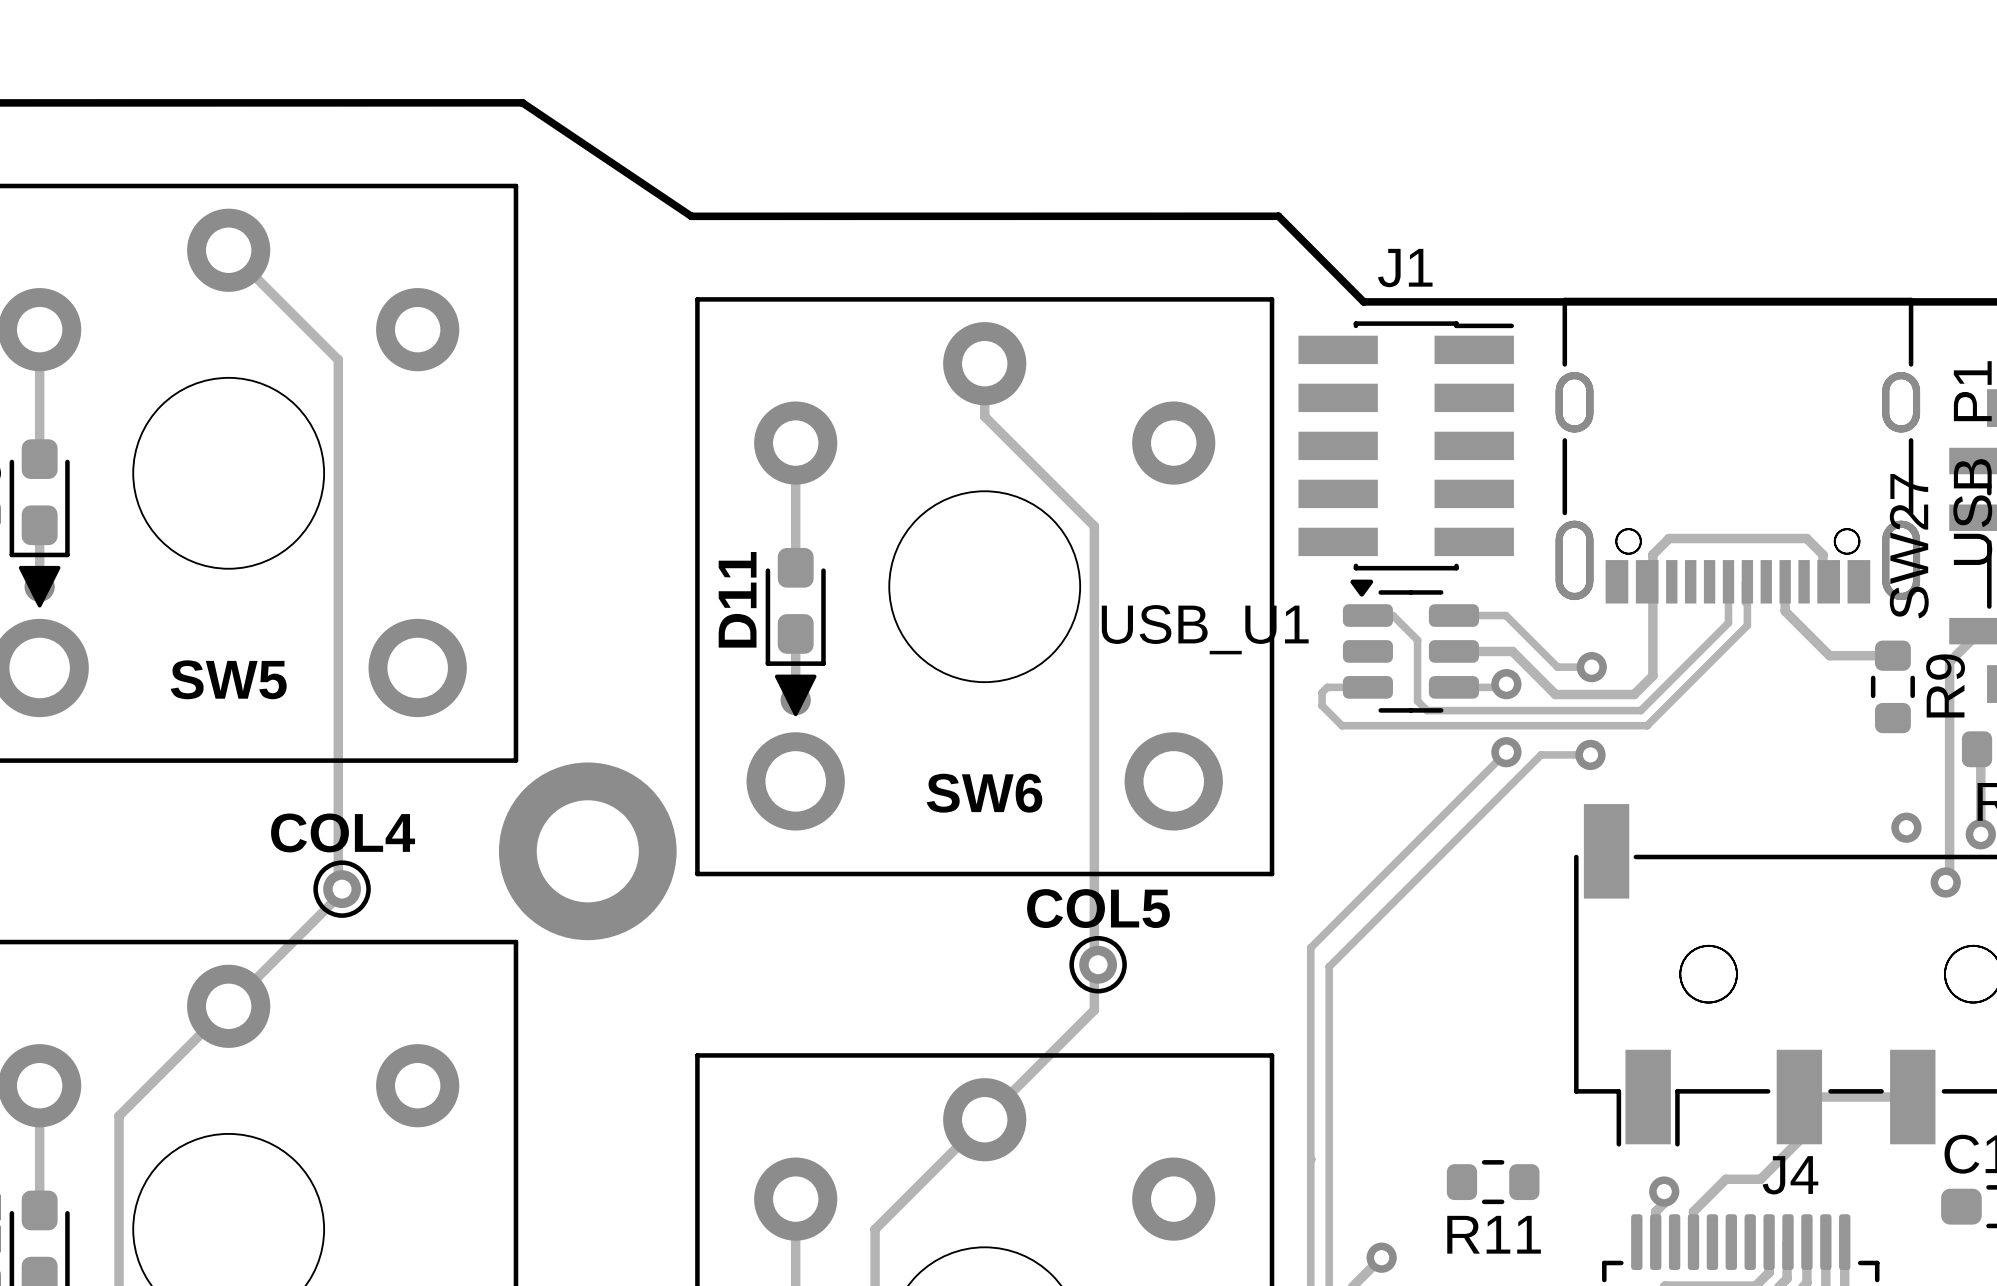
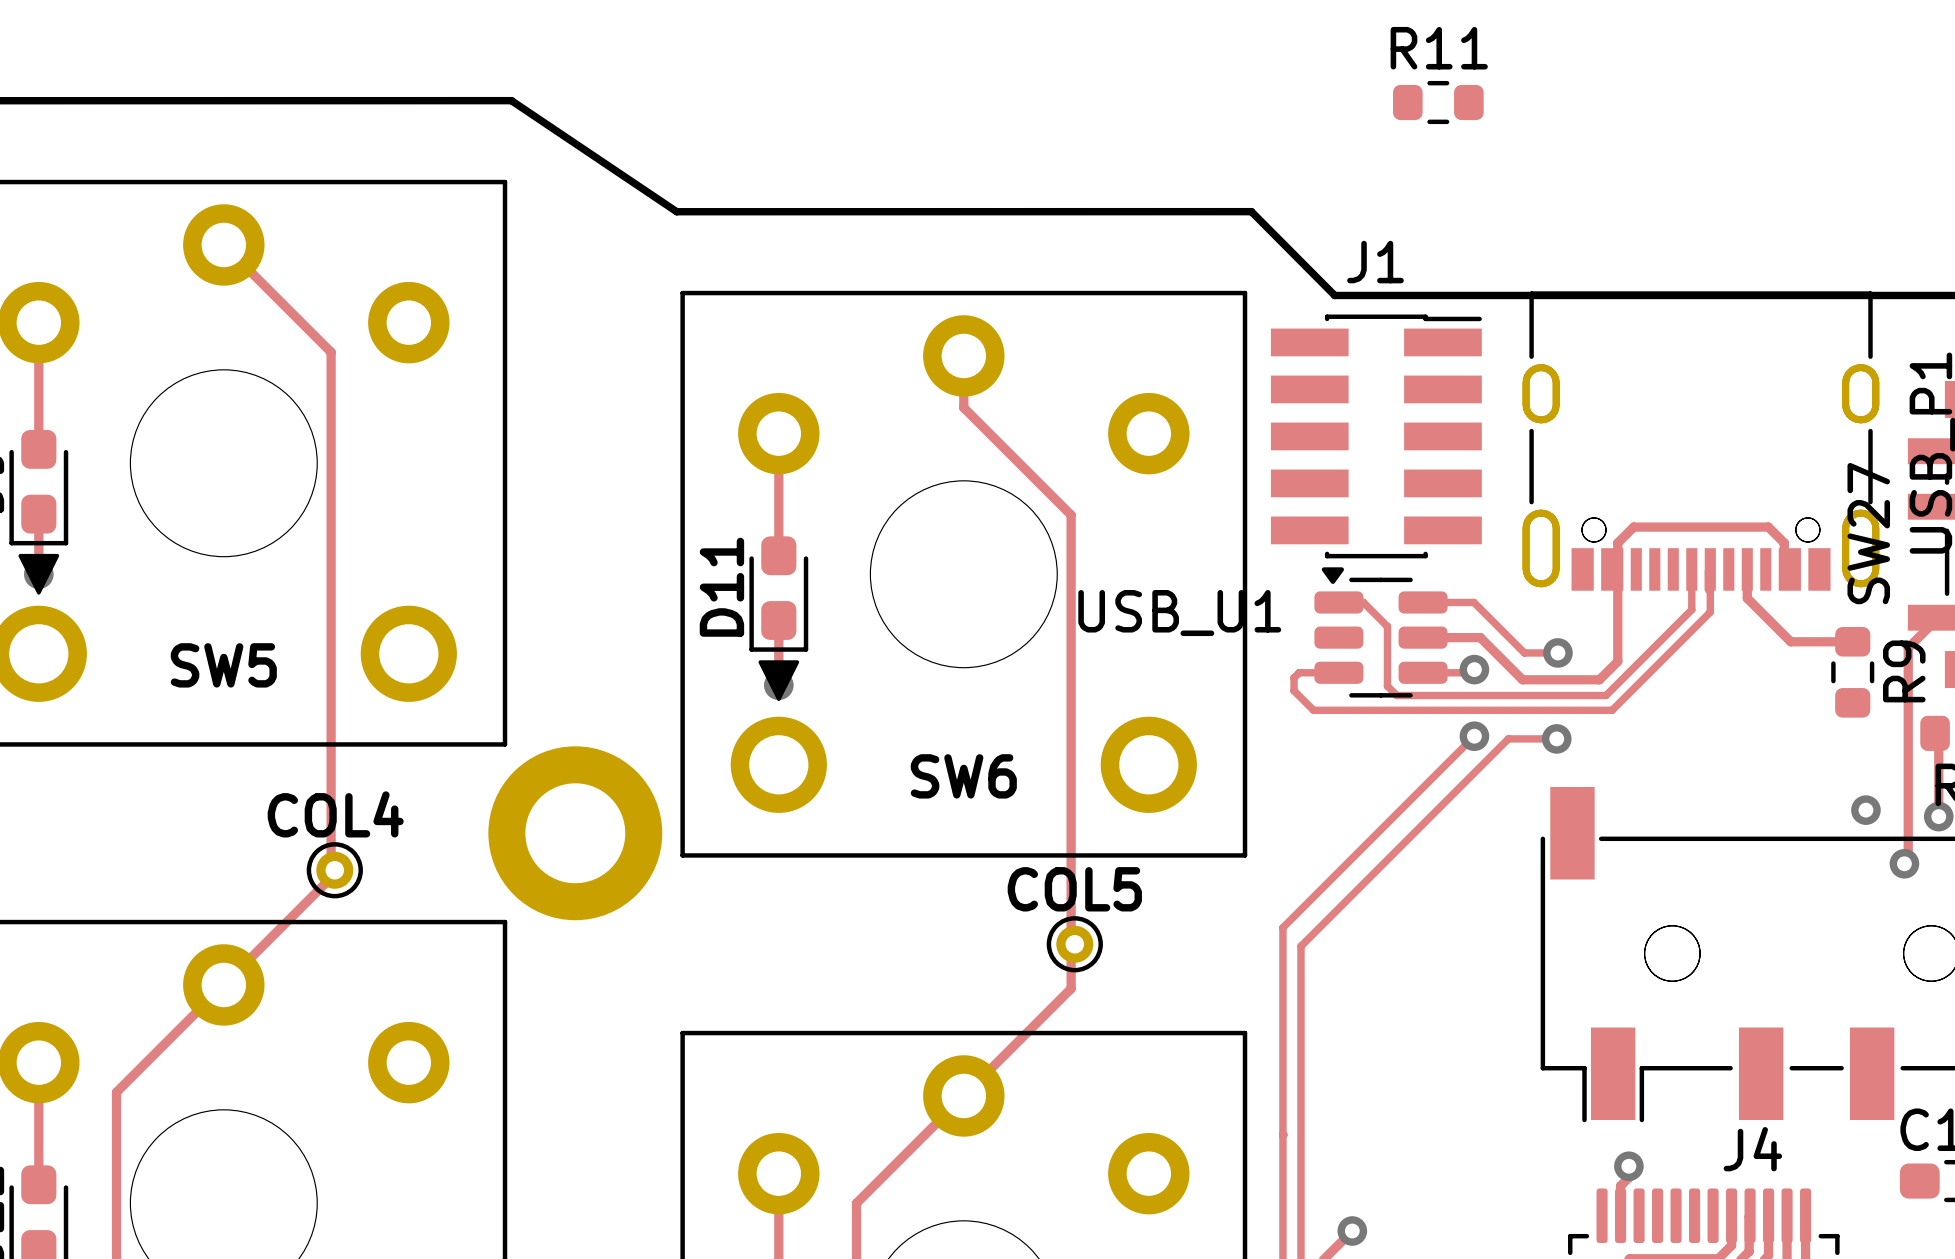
track: (1912, 1097) (1799, 1097) (1799, 1140) (1760, 1179) (1725, 1179) (1693, 1211) (1693, 1242) -> none
R11 position: (1493, 1182) -> (1438, 102)
R11 name position: R11 (1494, 1234) -> R11 (1439, 48)

